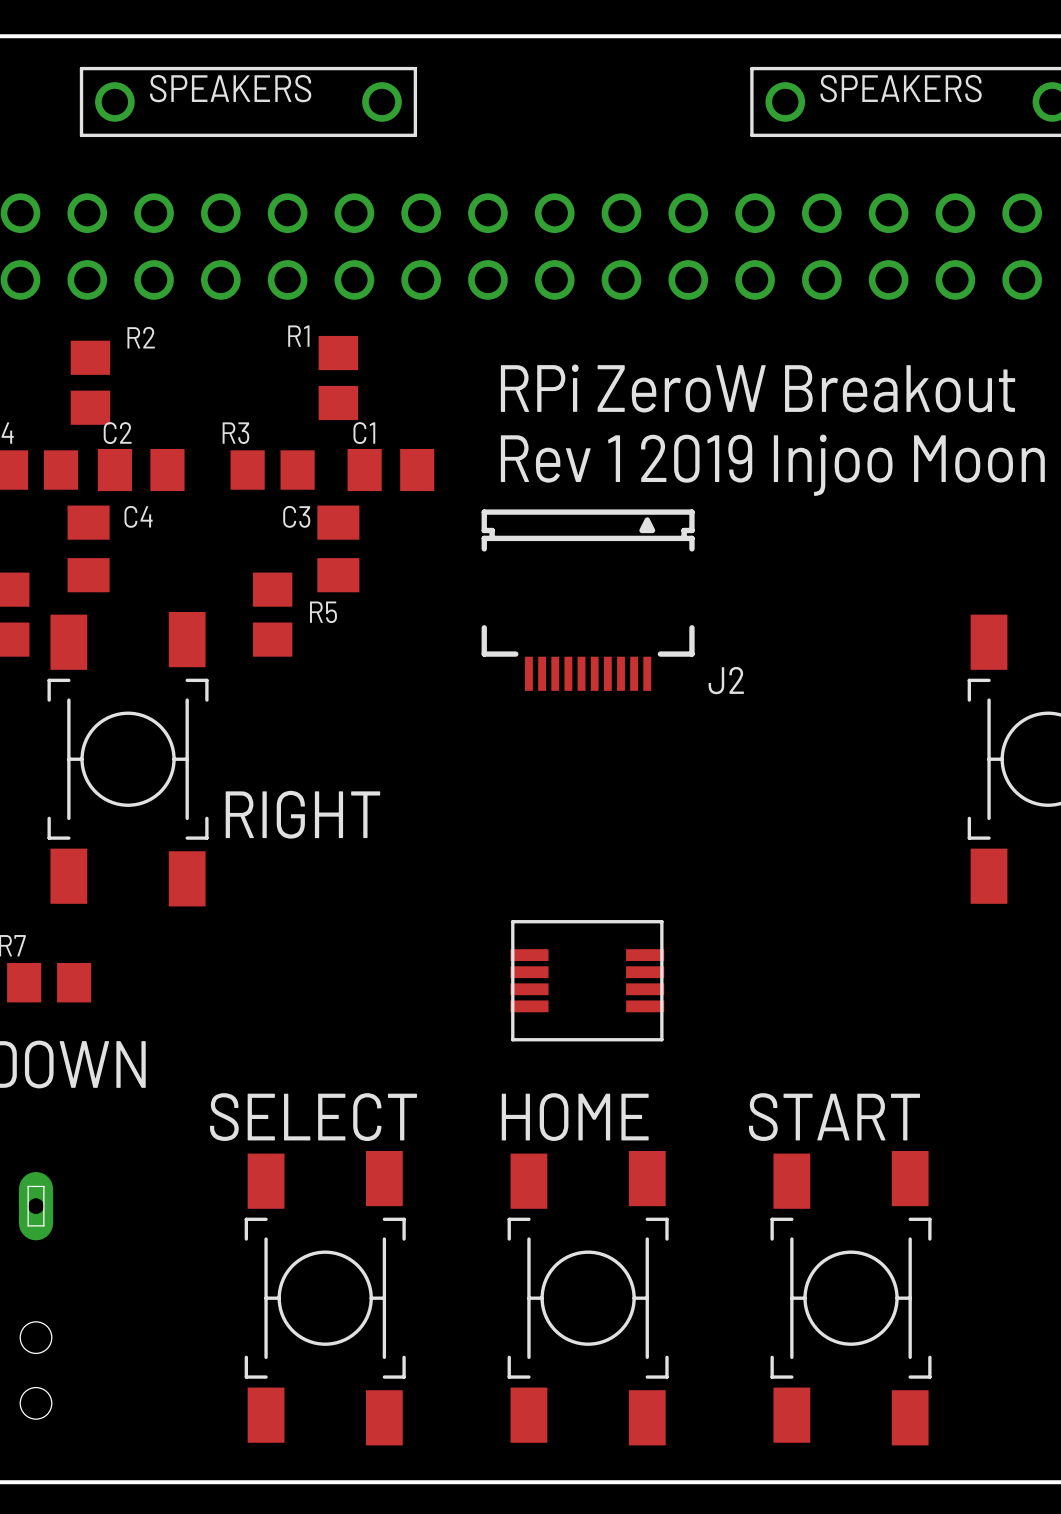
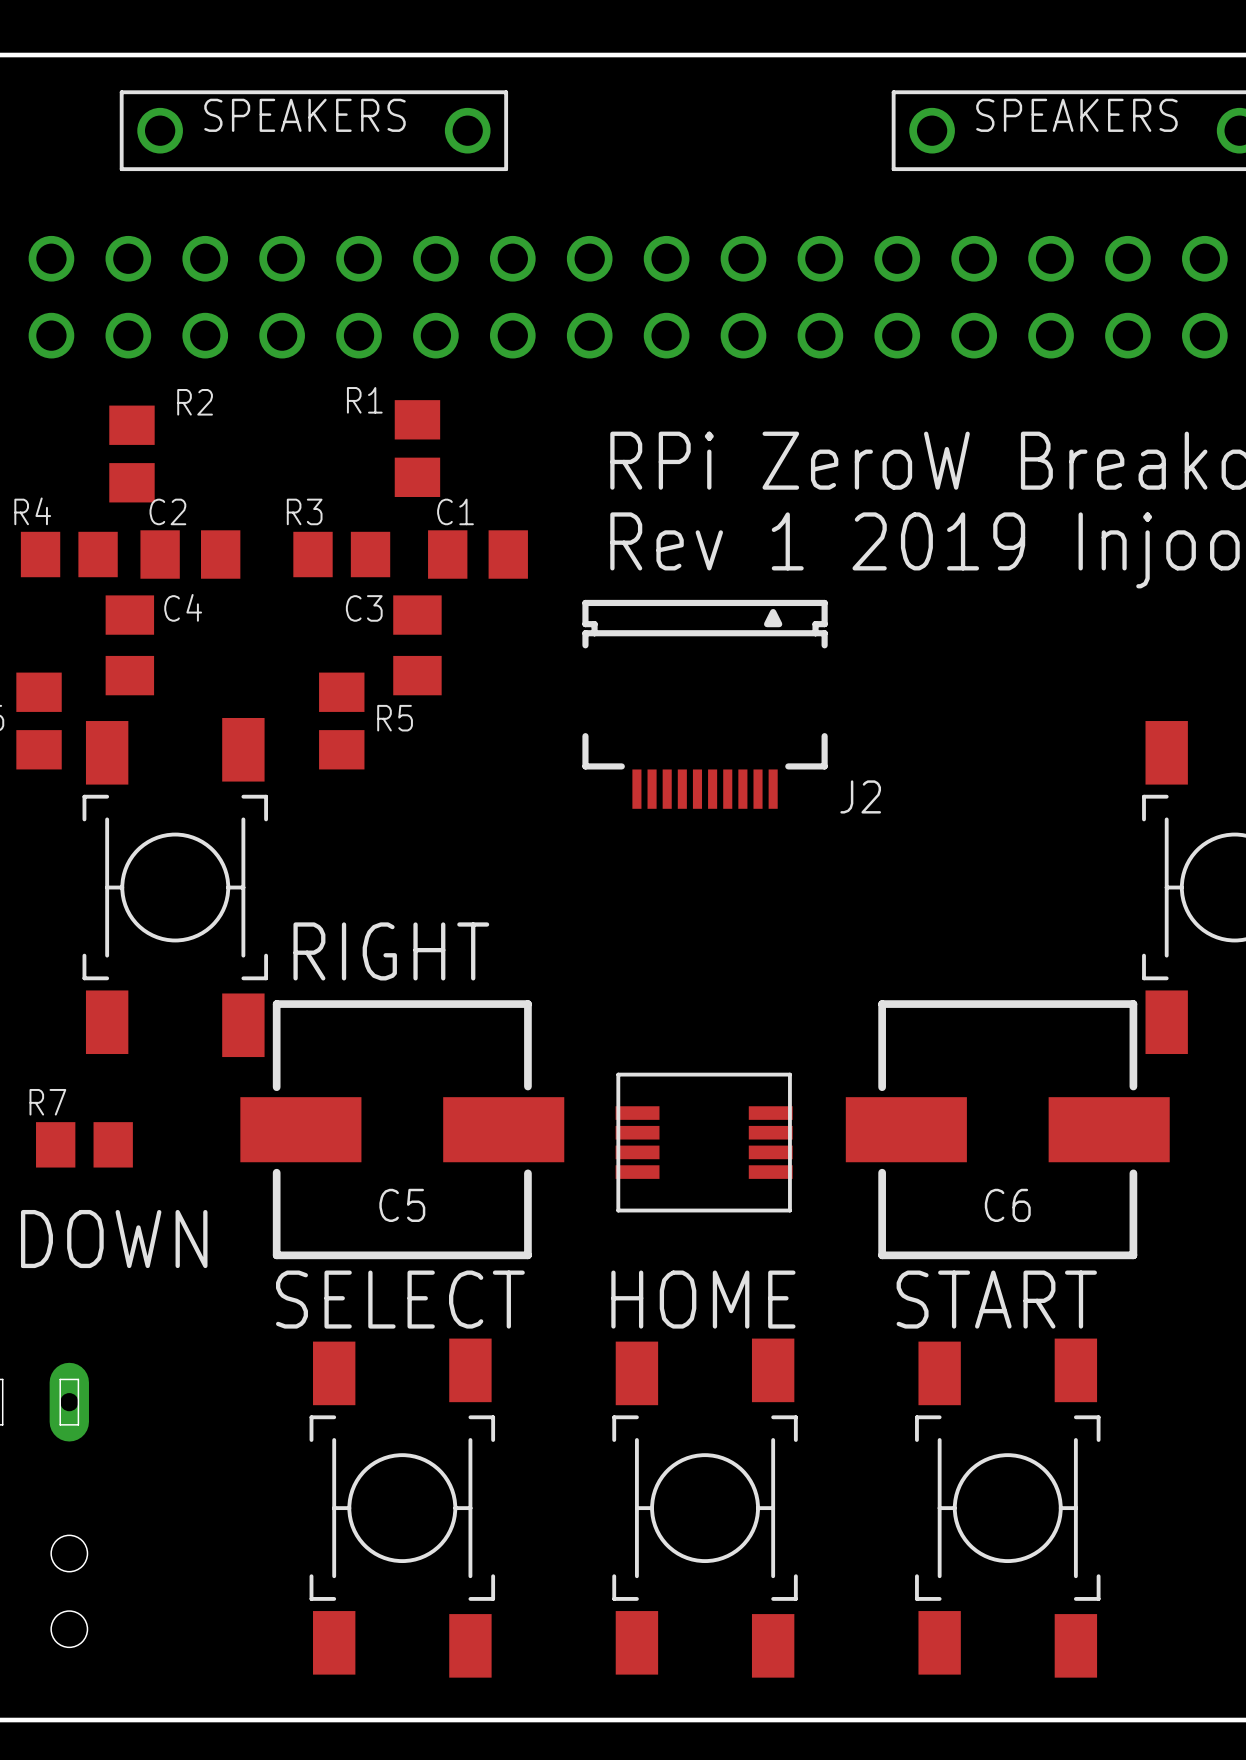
C5: none -> (402, 1129)
C6: none -> (1007, 1129)

